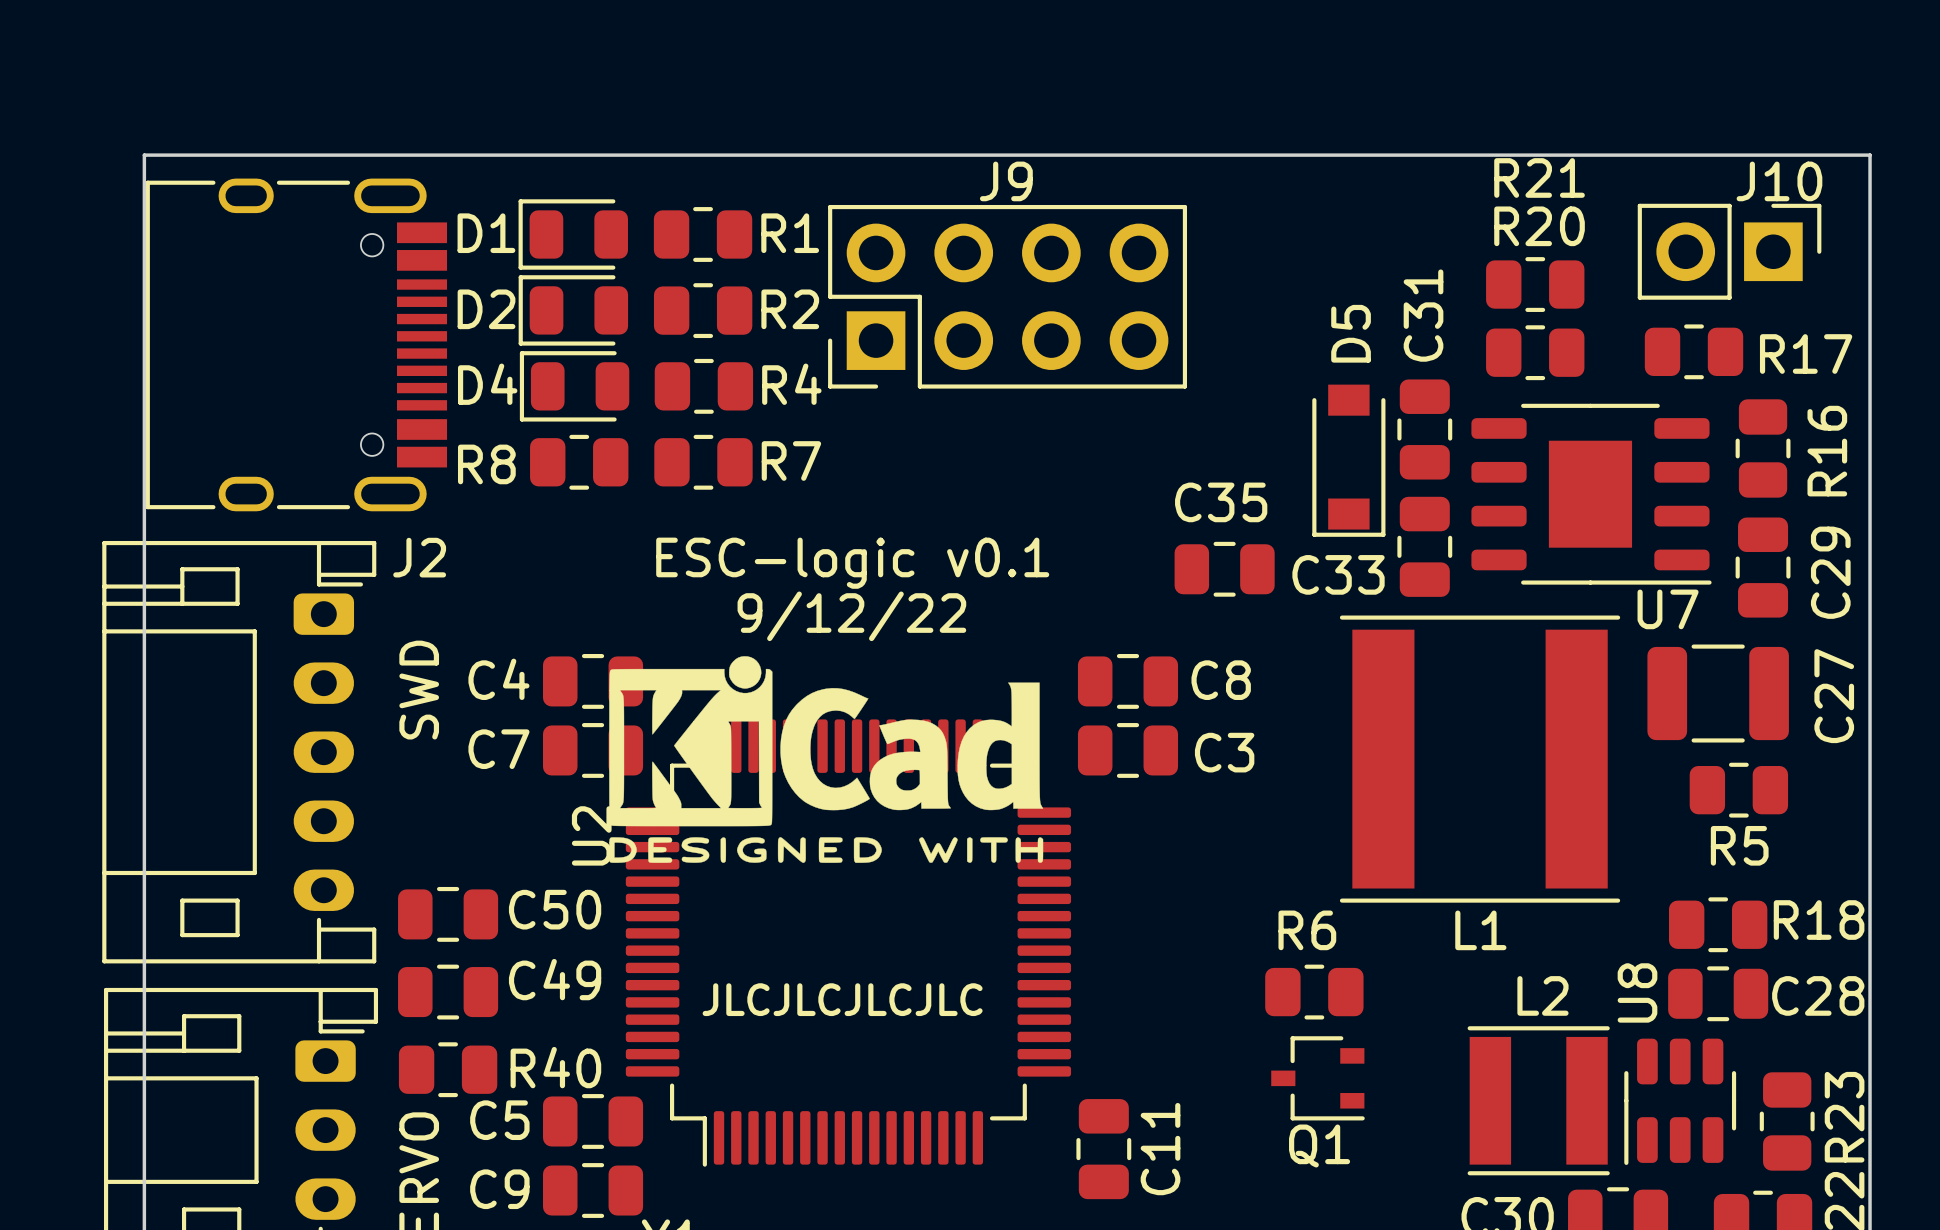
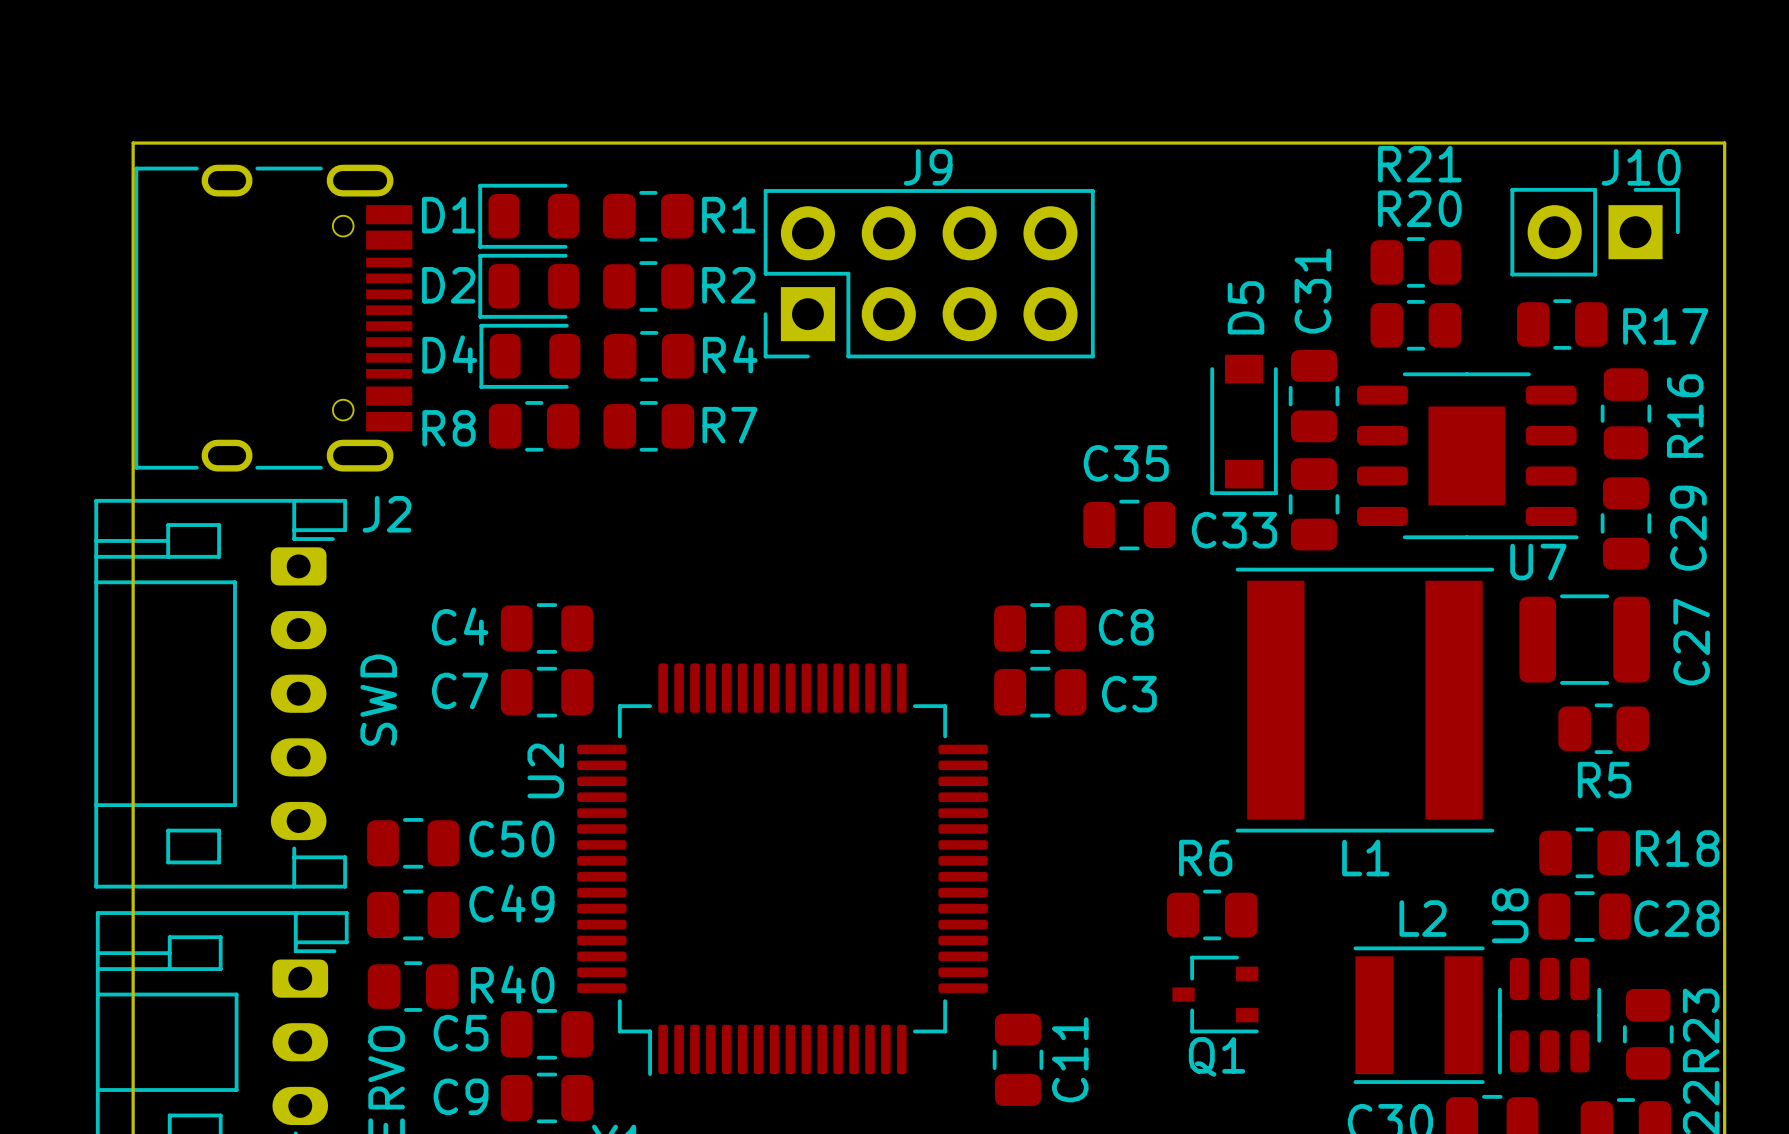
text: ESC-logic v0.1 (852, 563) -> none
text: 9/12/22 (851, 616) -> none
drawing: [609, 656, 1044, 863] -> none
part value position: SWD (419, 690) -> SWD (378, 700)
text: JLCJLCJLCJLC (842, 999) -> none

